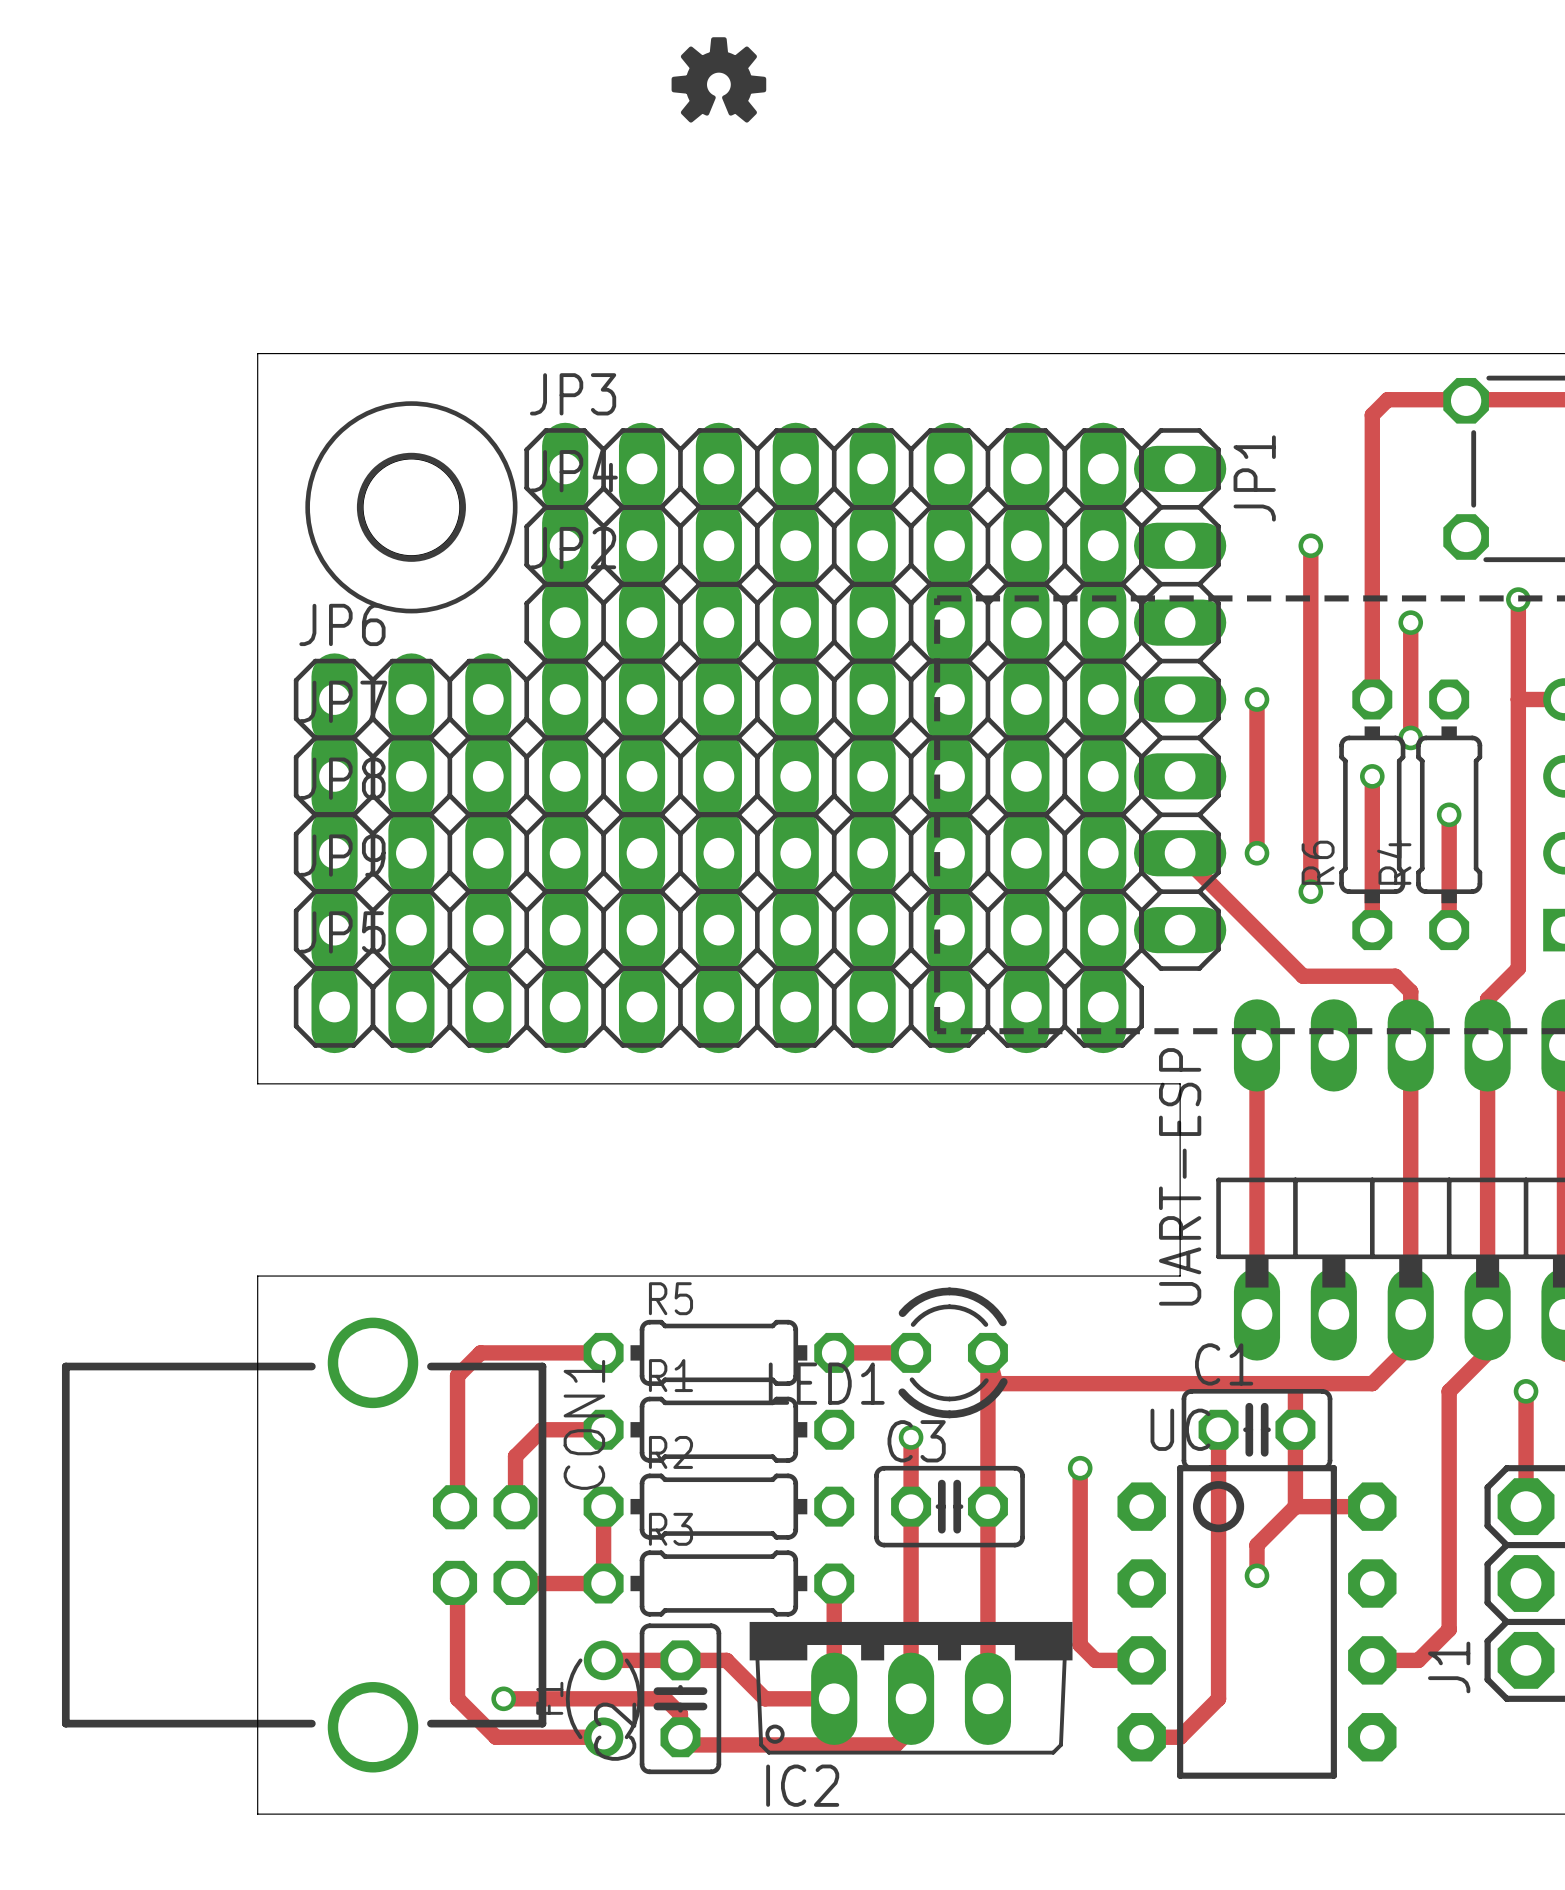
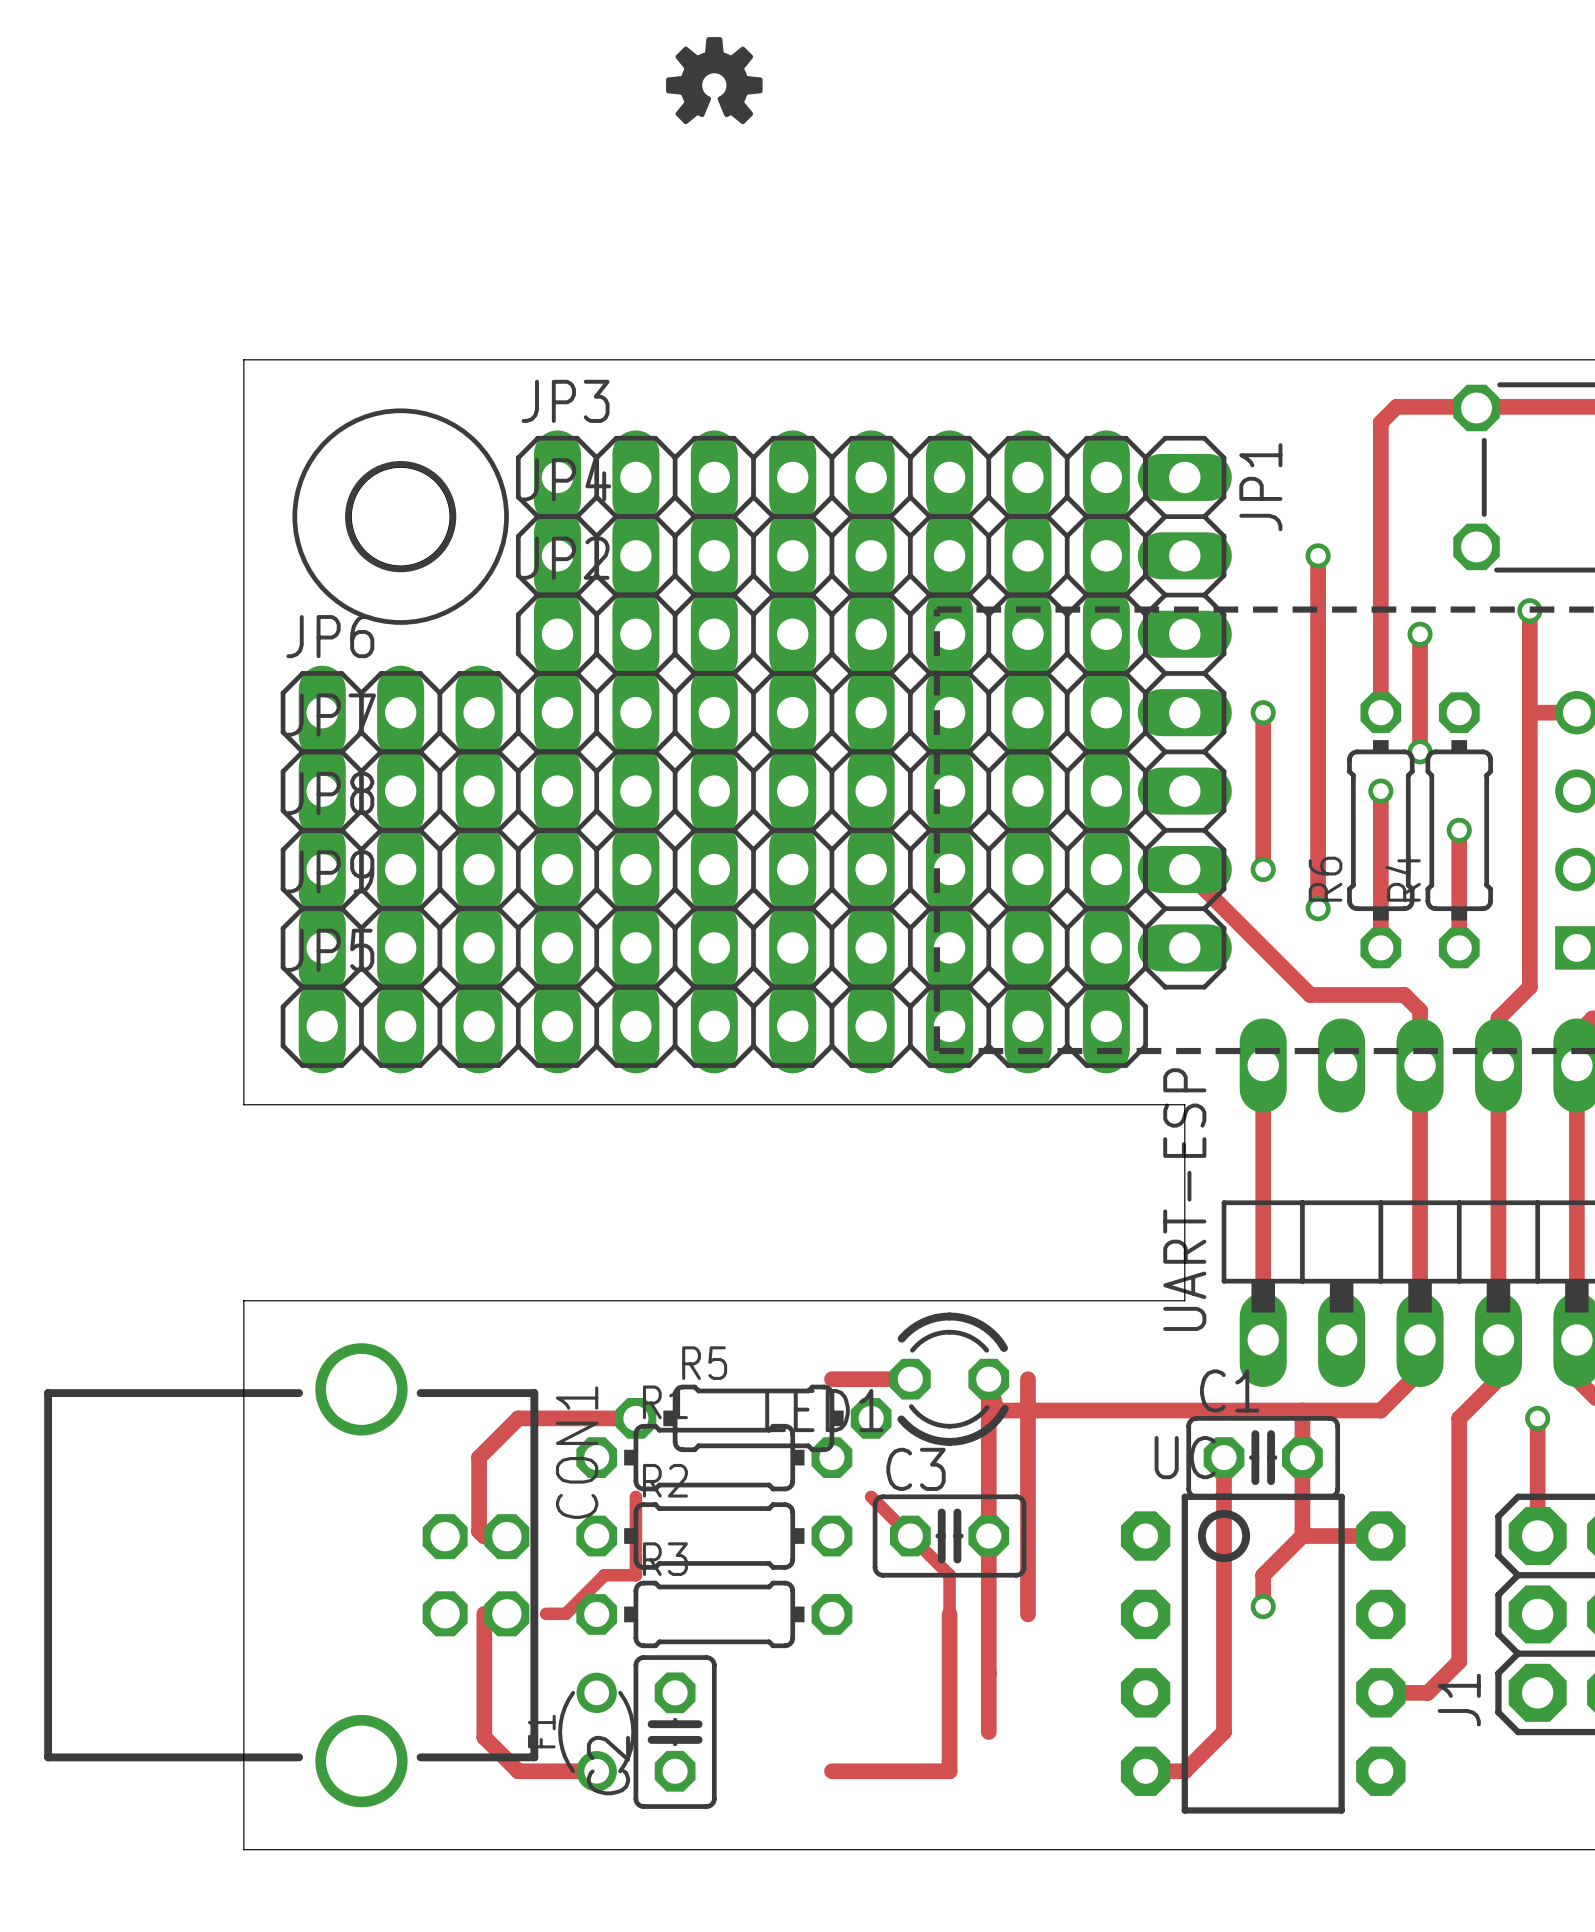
track: (603, 1352) (480, 1352) (457, 1375) (457, 1504) (455, 1507) -> none
R5 position: (718, 1352) -> (753, 1418)
track: none -> (1027, 1379) (1027, 1614)
track: none -> (635, 1418) (518, 1418) (479, 1457) (479, 1531) (484, 1536)
track: (603, 1429) (542, 1429) (515, 1456) (515, 1507) -> none
track: (911, 1437) (911, 1729) (895, 1744) (688, 1744) (680, 1737) (680, 1714) (665, 1698) (503, 1698) -> none
via: (911, 1437) -> none
track: none -> (635, 1496) (635, 1575) (604, 1575) (565, 1613) (546, 1613)
track: none -> (871, 1496) (949, 1575) (949, 1771) (831, 1771)
track: (1080, 1468) (1080, 1645) (1095, 1660) (1141, 1660) -> none
via: (1080, 1468) -> none
track: (603, 1506) (603, 1583) (511, 1583) (515, 1582) -> none
track: (455, 1582) (457, 1583) (457, 1698) (495, 1737) (526, 1737) -> (484, 1613) (484, 1737) (518, 1771)
track: (834, 1583) (834, 1698) (765, 1698) (726, 1660) (603, 1660) -> none
IC2: (911, 1688) -> none
via: (503, 1698) -> none

